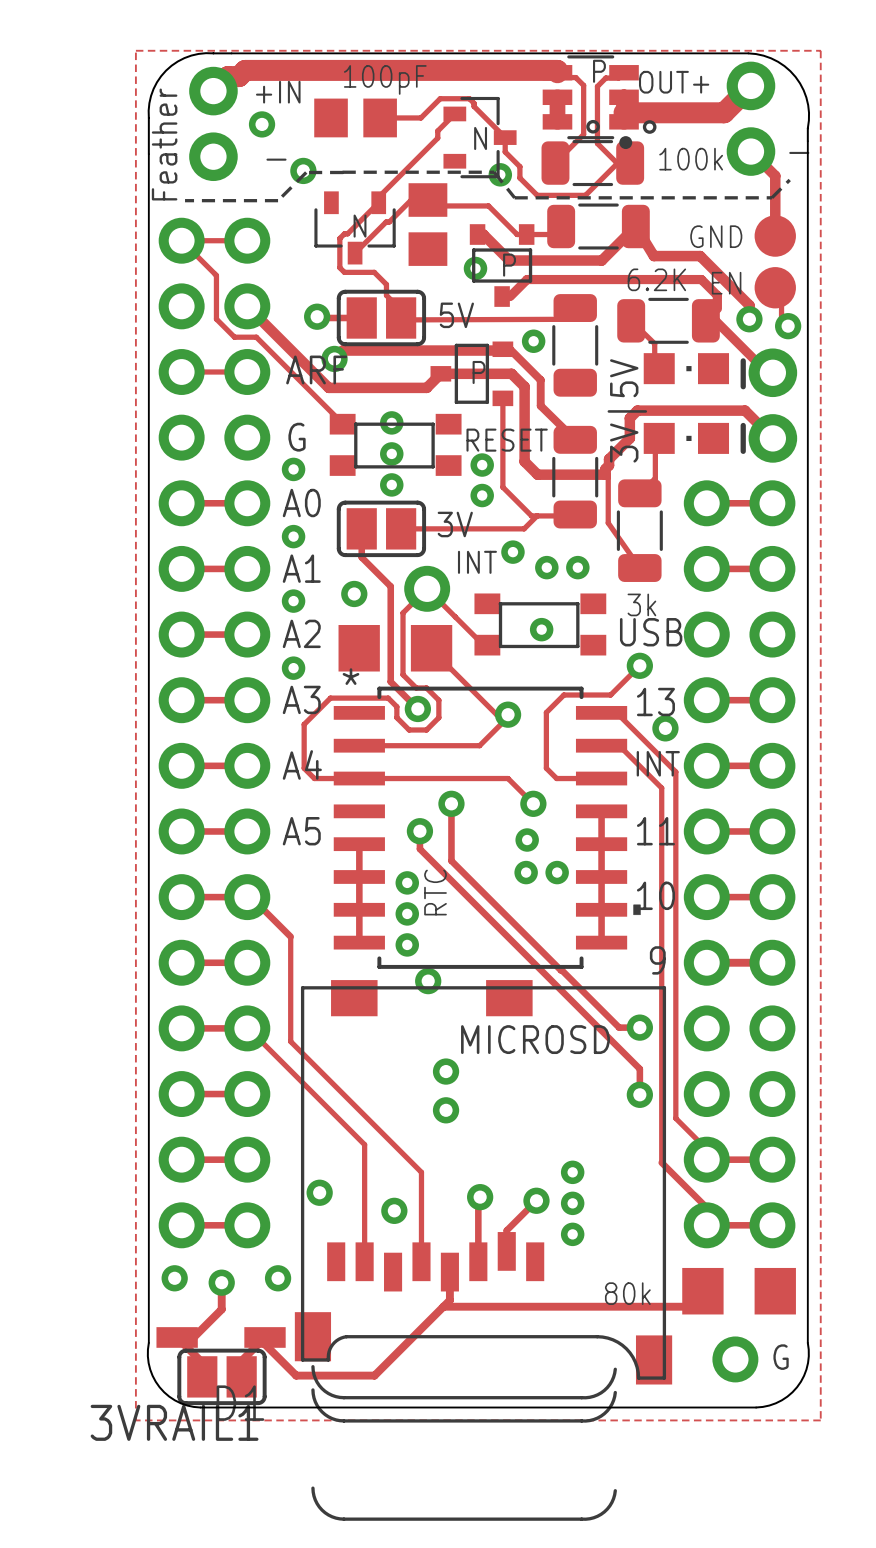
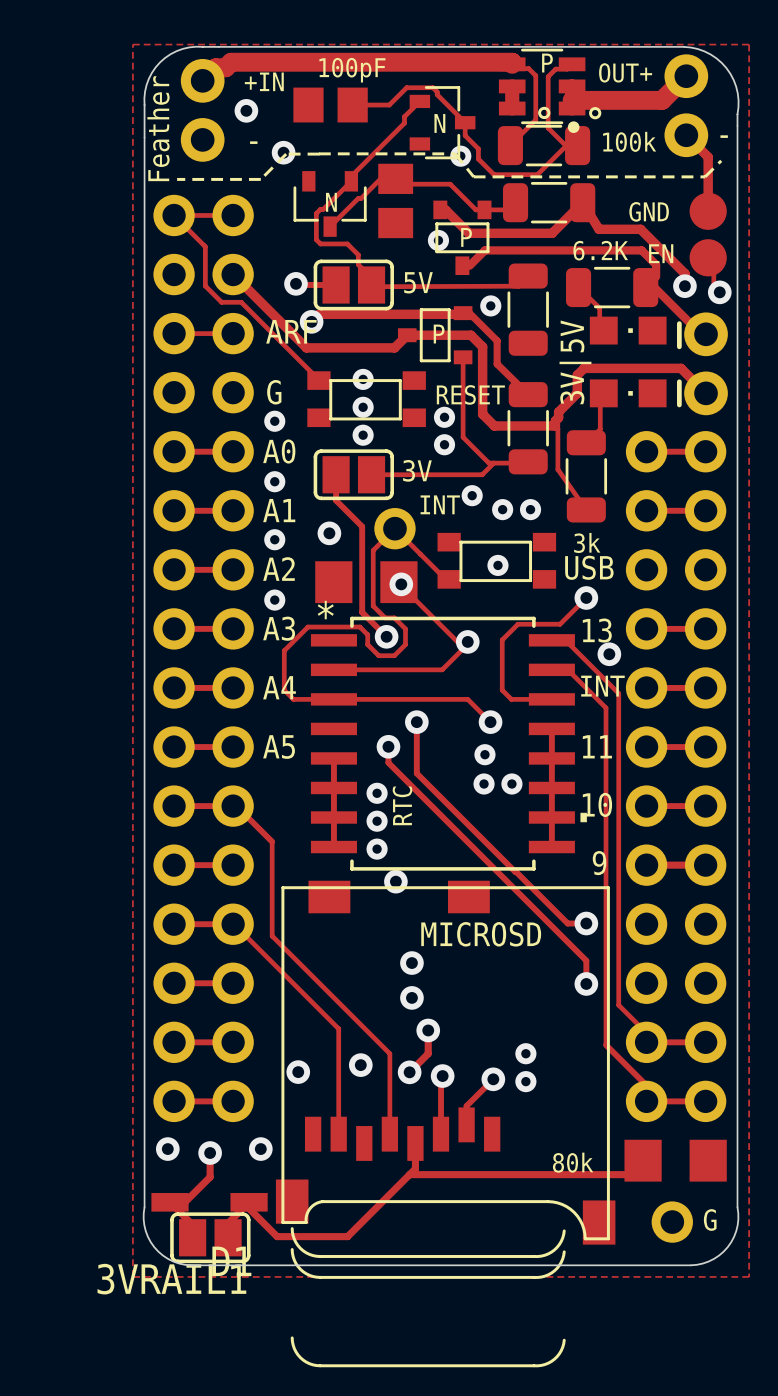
via: none -> (401, 584)
track: none -> (428, 1030) (428, 1053) (409, 1072)
via: none -> (428, 1030)
via: none -> (360, 1065)
via: none -> (409, 1072)
via: (394, 1210) -> none
via: (572, 1234) -> none

